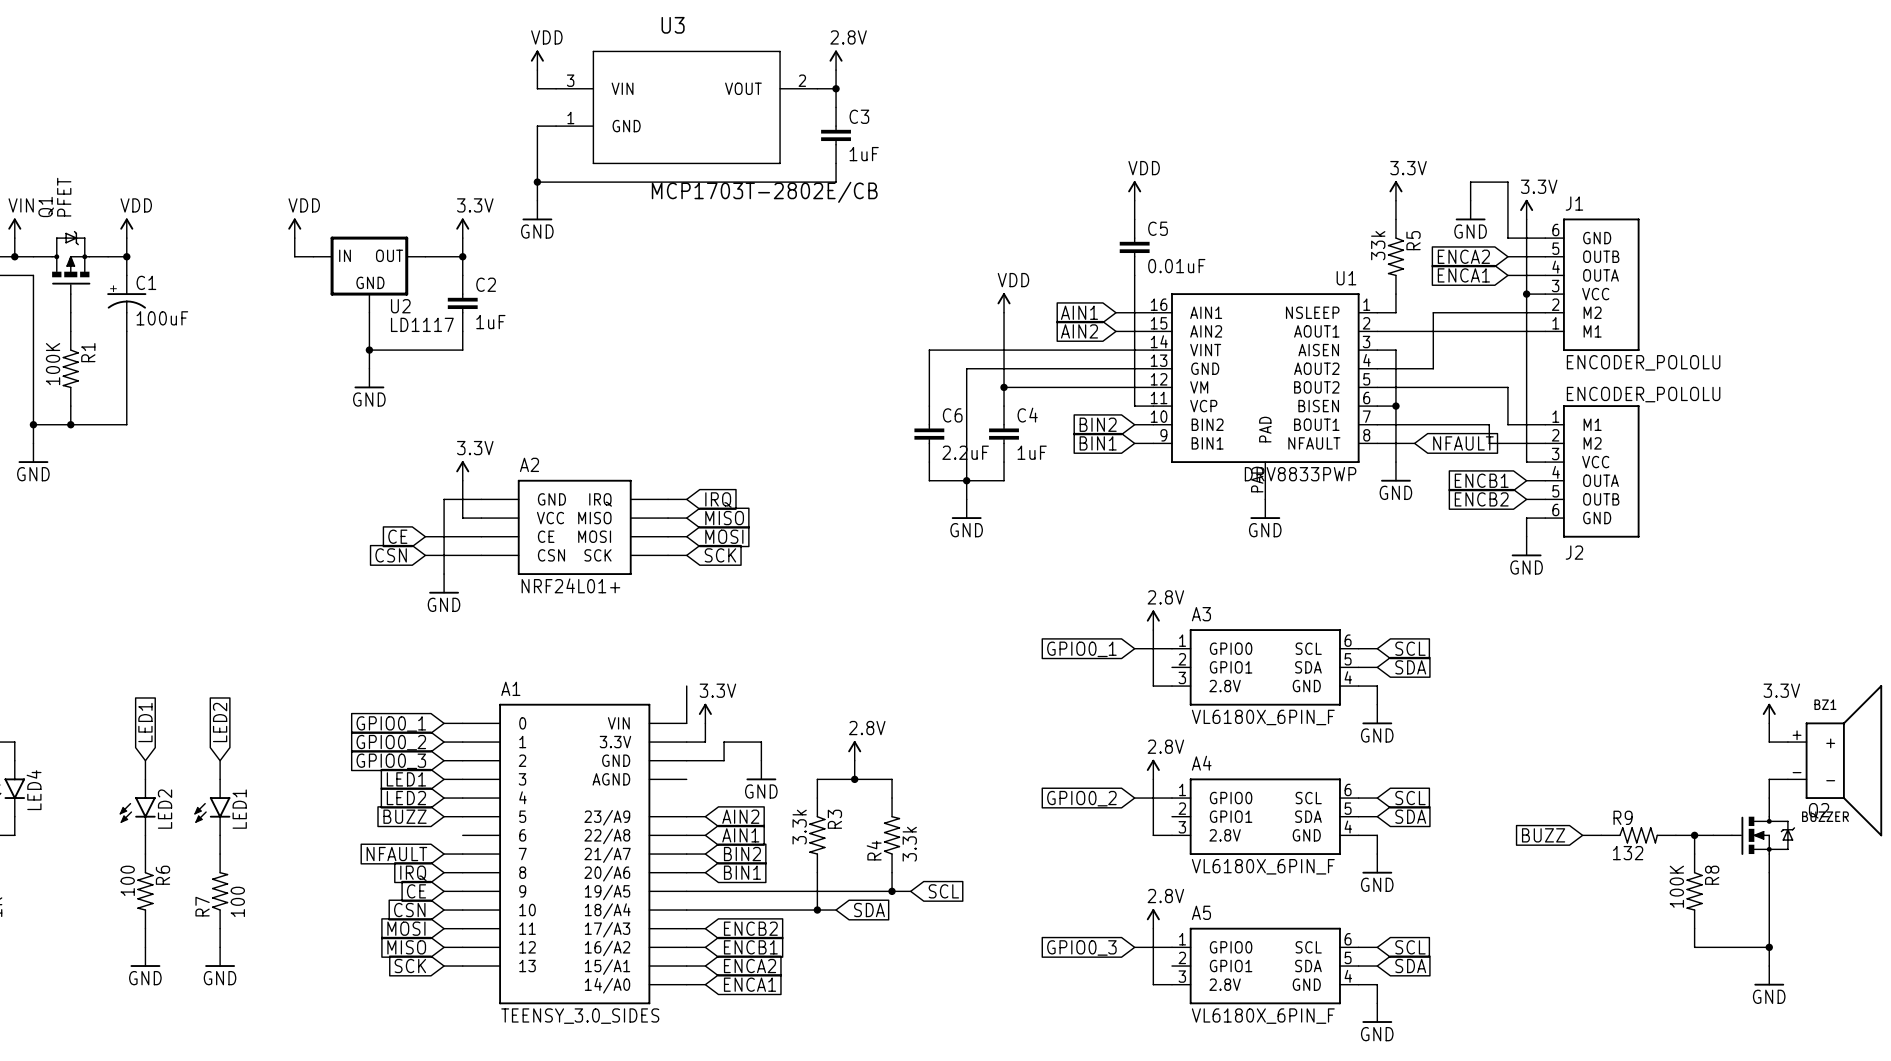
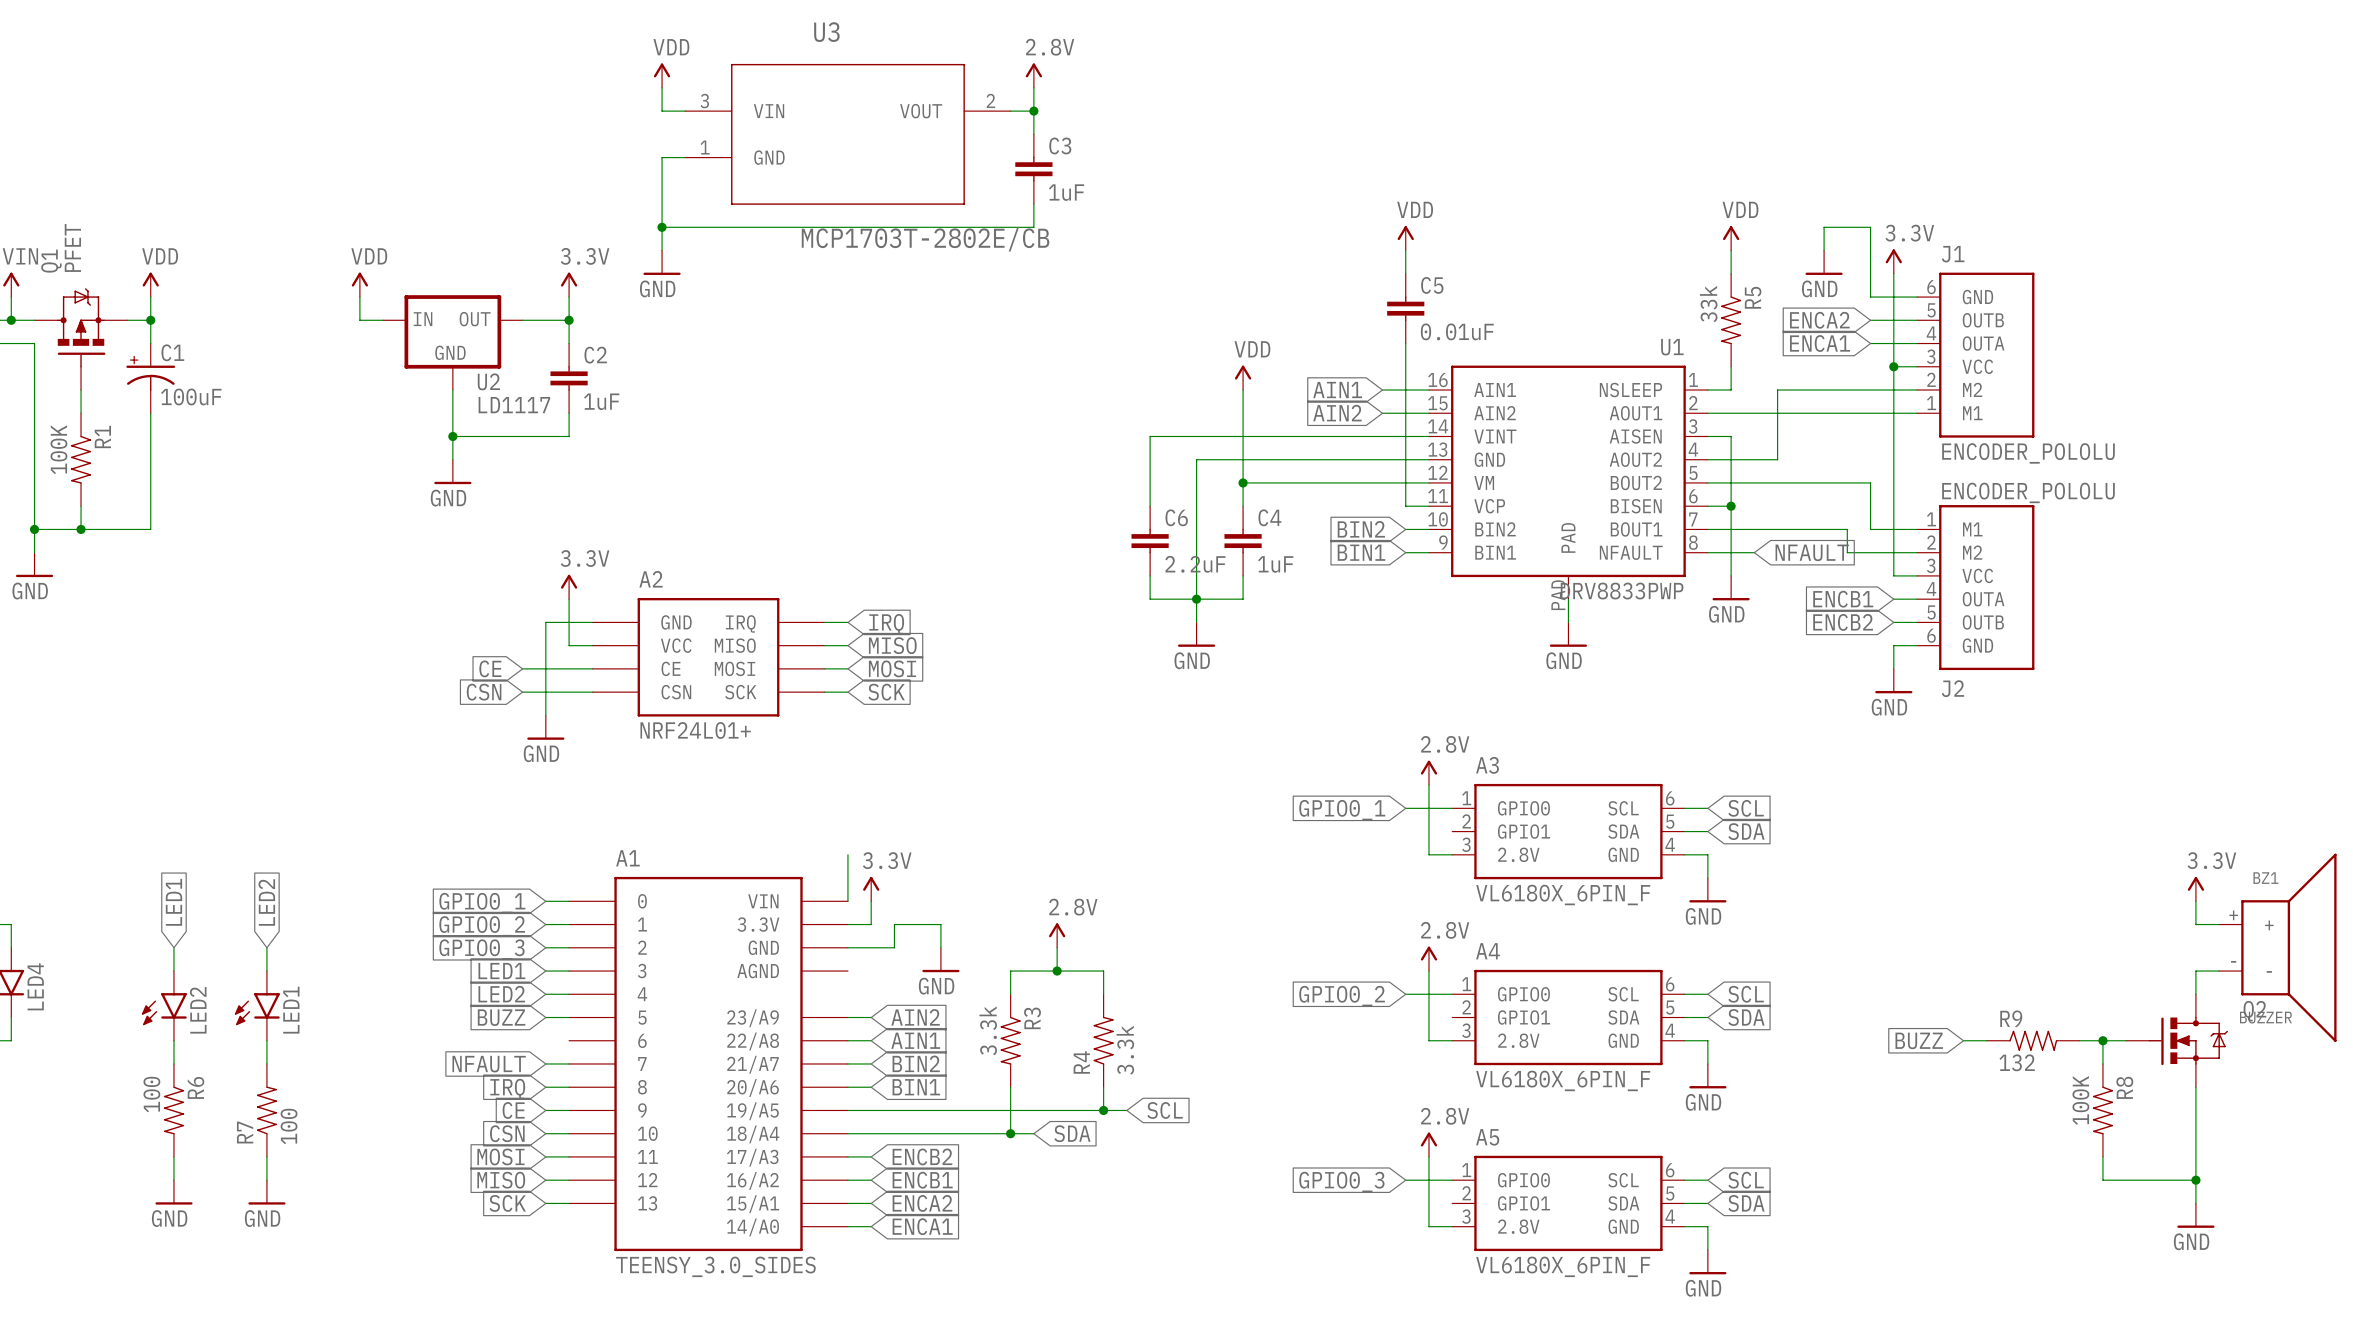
power symbol: 3.3V (1395, 190) -> VDD (1731, 238)

